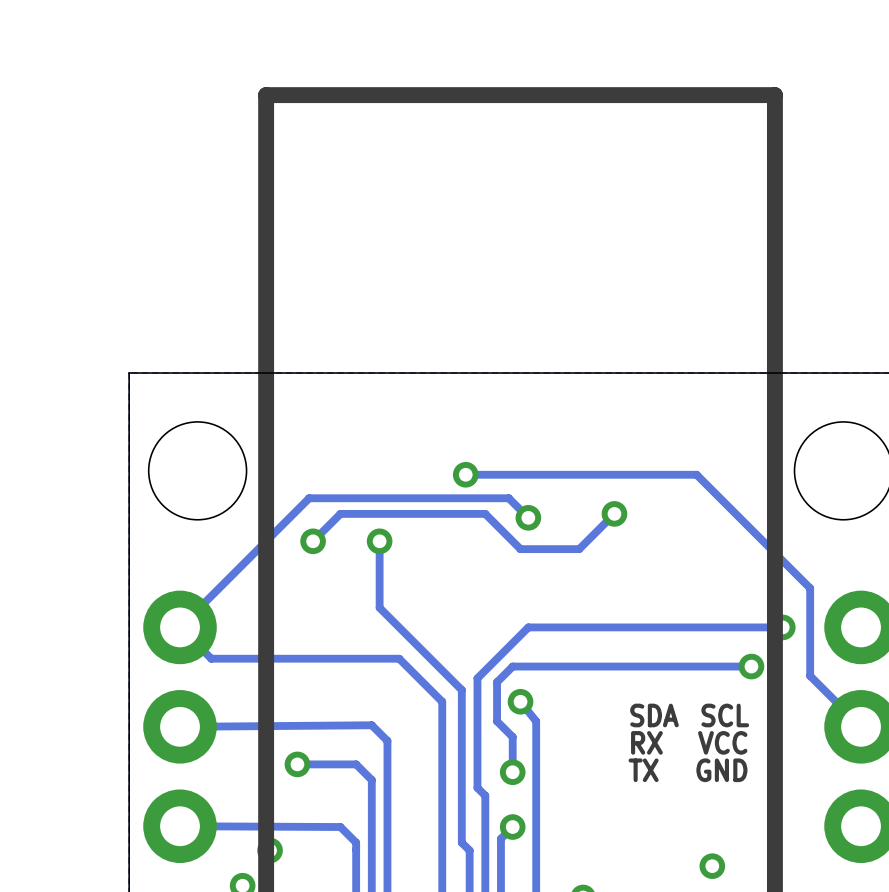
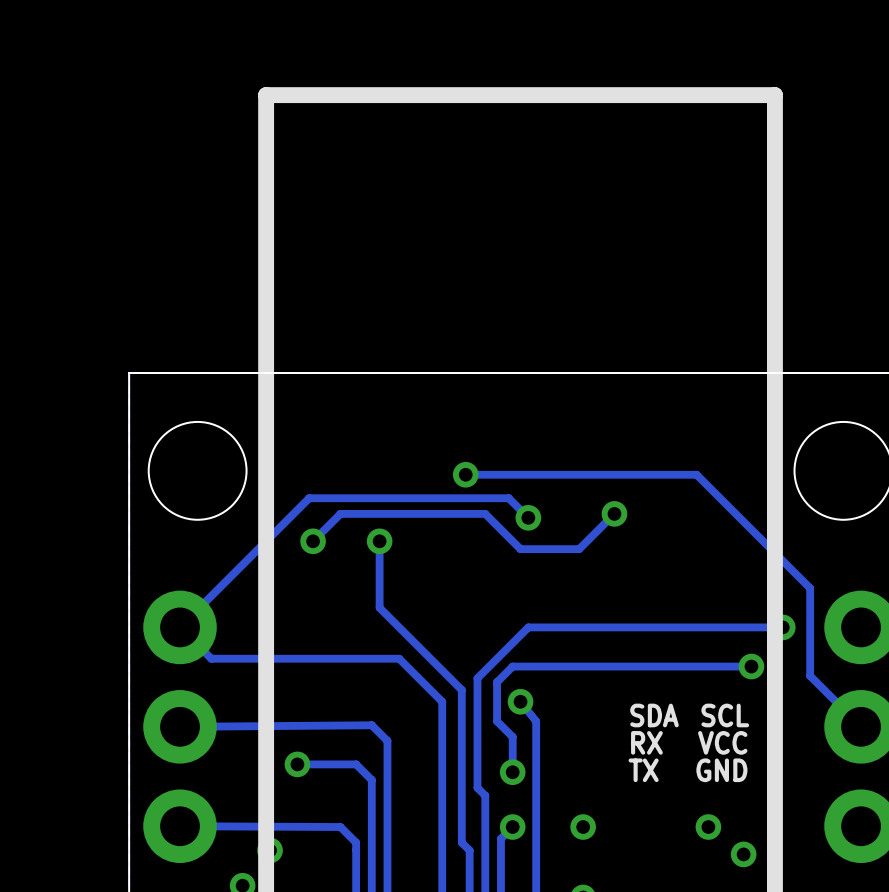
via: none -> (583, 827)
via: none -> (708, 827)
via: none -> (743, 854)
via: (712, 866) -> none

